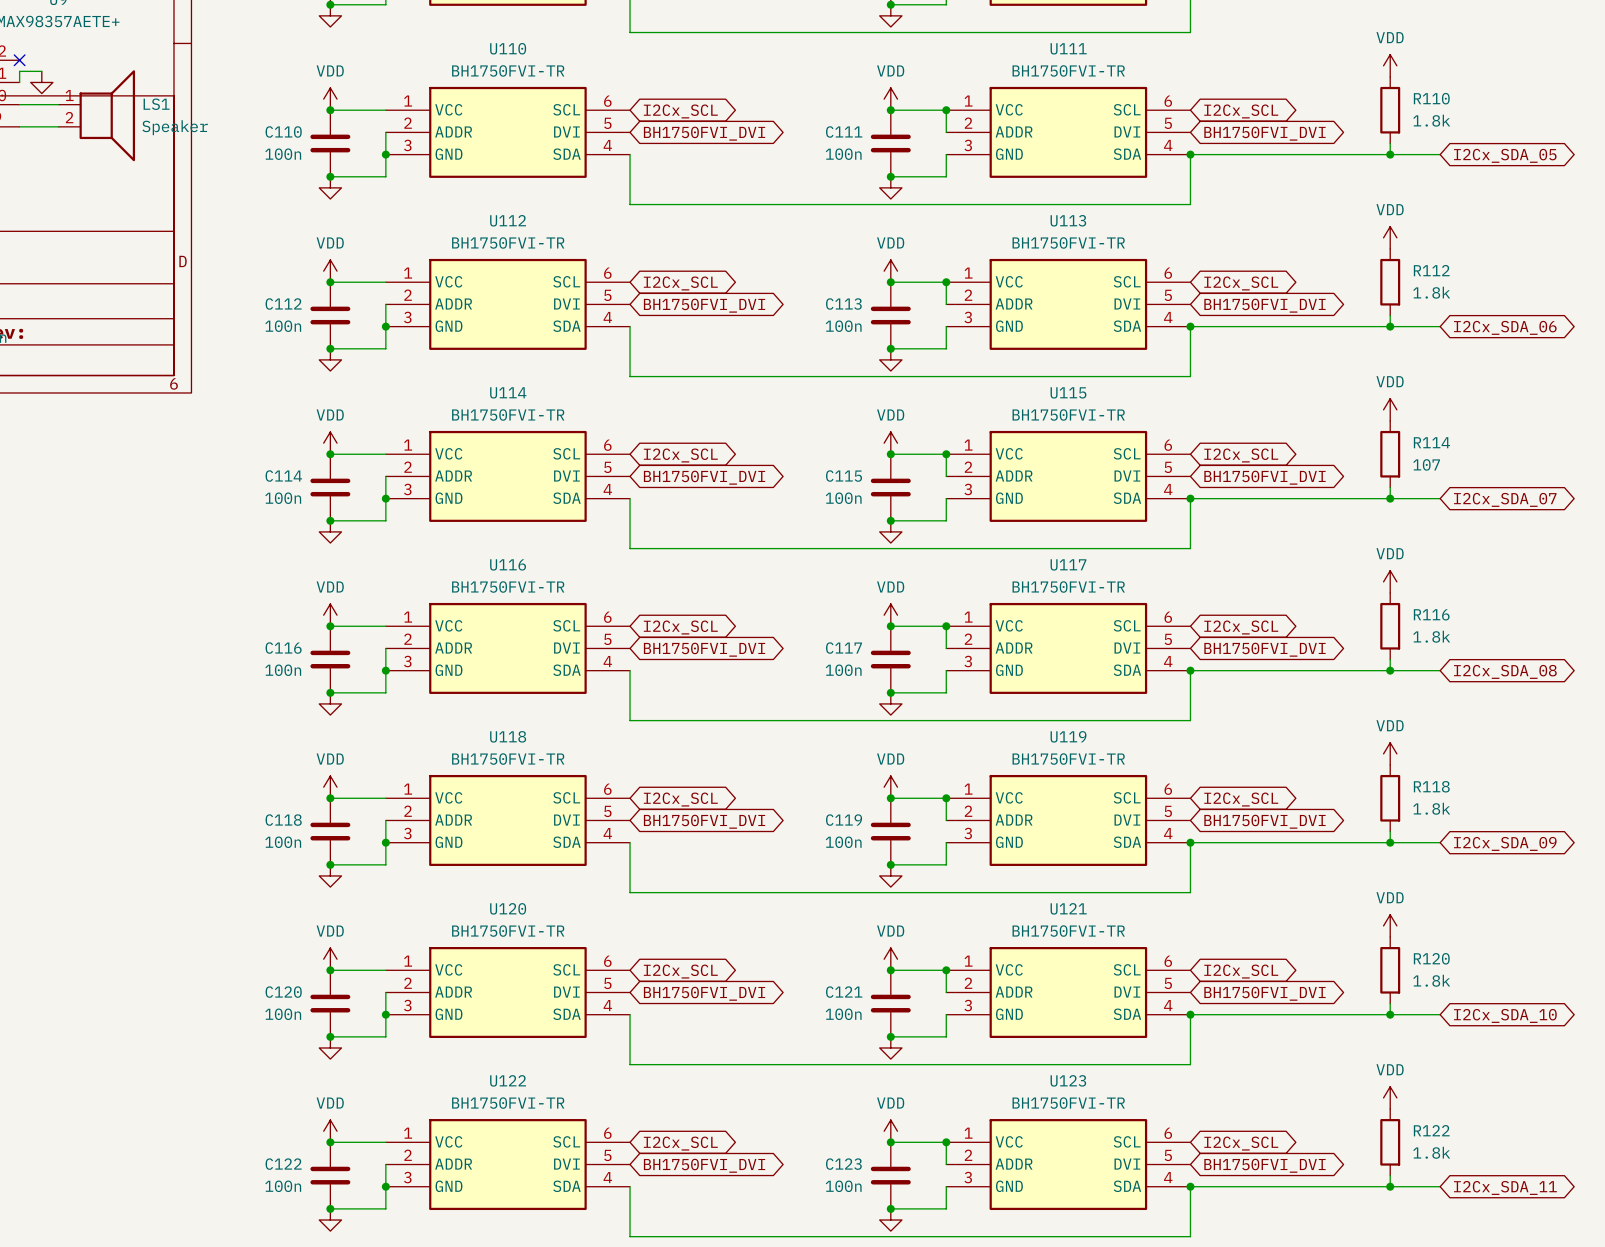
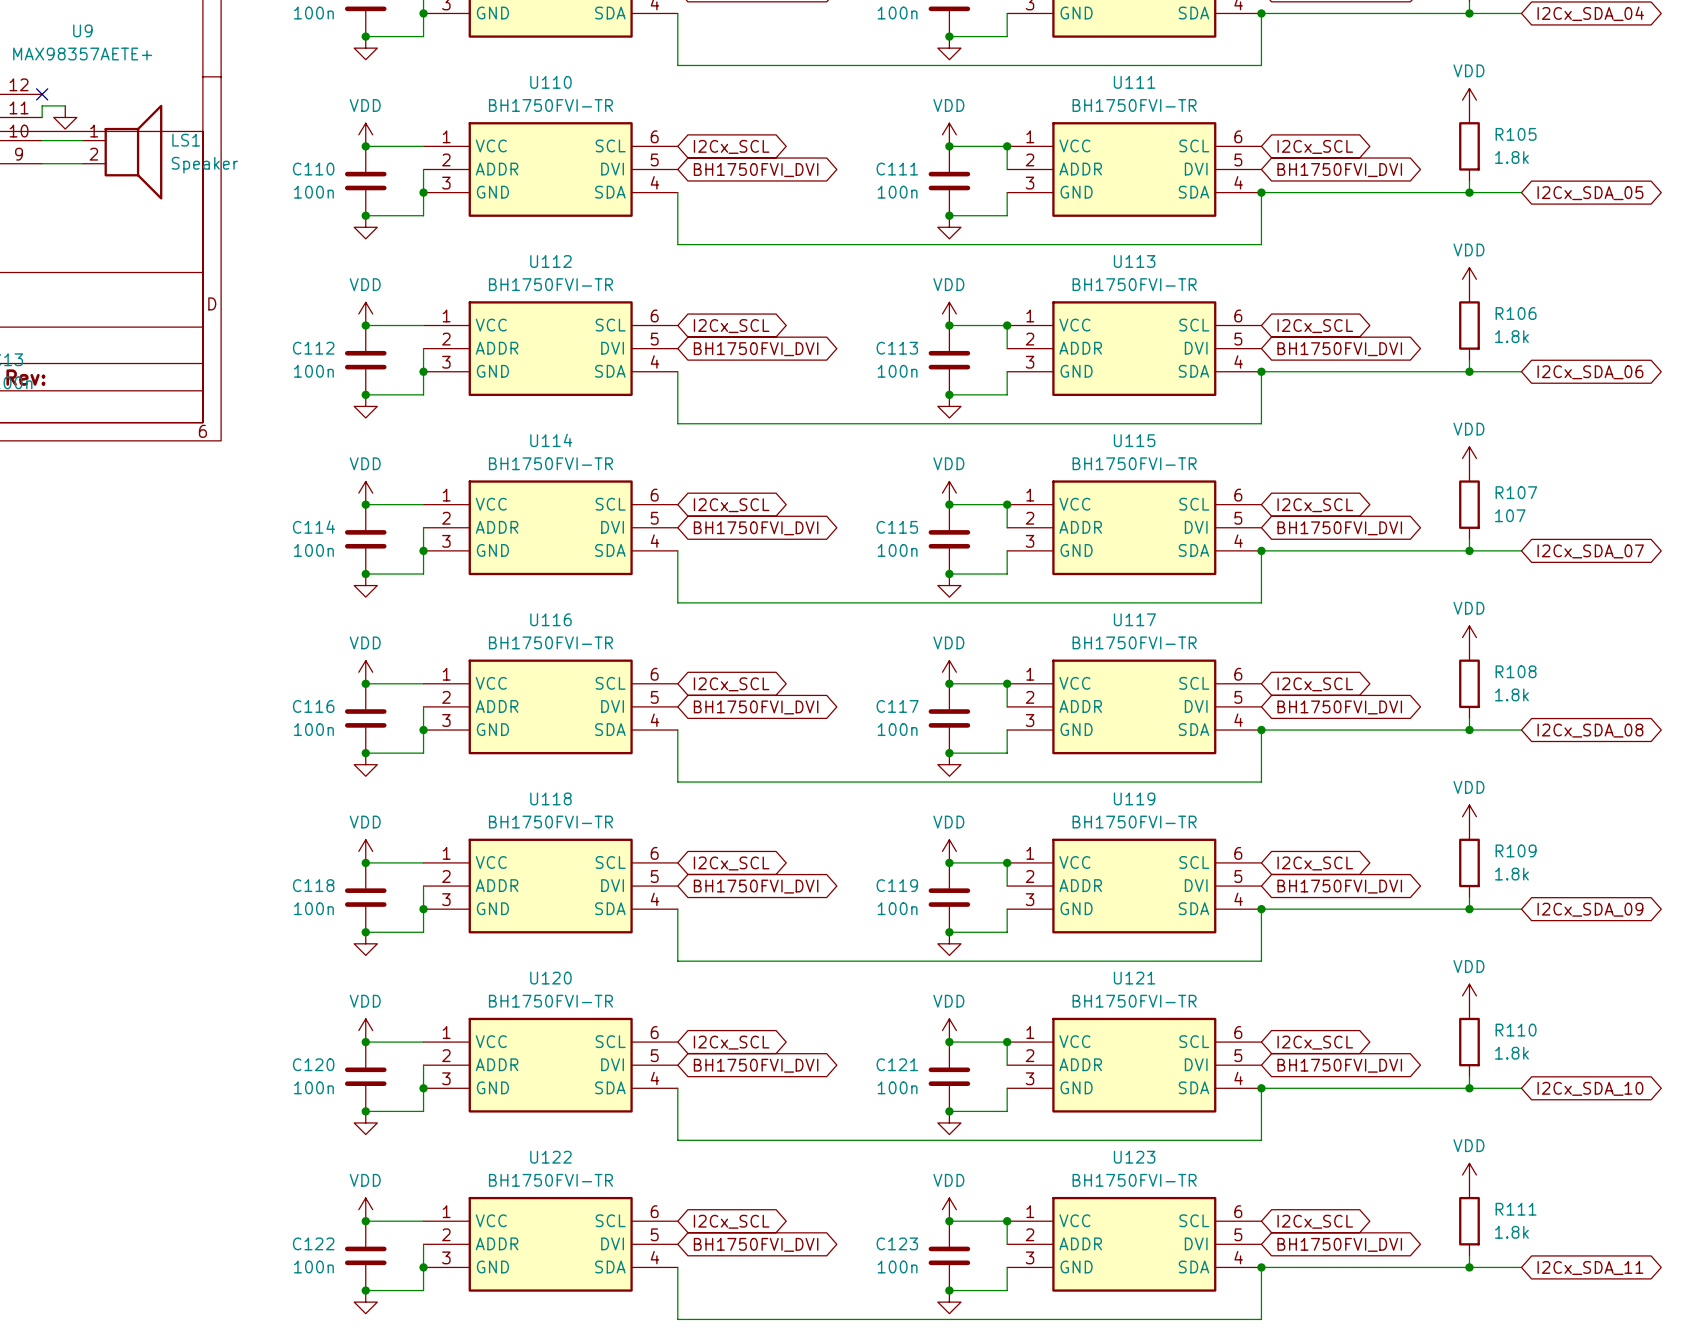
R110 name: R110 (1431, 98) -> R105 (1516, 134)
R112 name: R112 (1431, 270) -> R106 (1516, 313)
R114 name: R114 (1431, 442) -> R107 (1516, 492)
R116 name: R116 (1431, 614) -> R108 (1516, 671)
R118 name: R118 (1431, 786) -> R109 (1516, 850)
R120 name: R120 (1431, 958) -> R110 (1516, 1030)
R122 name: R122 (1431, 1130) -> R111 (1516, 1209)

